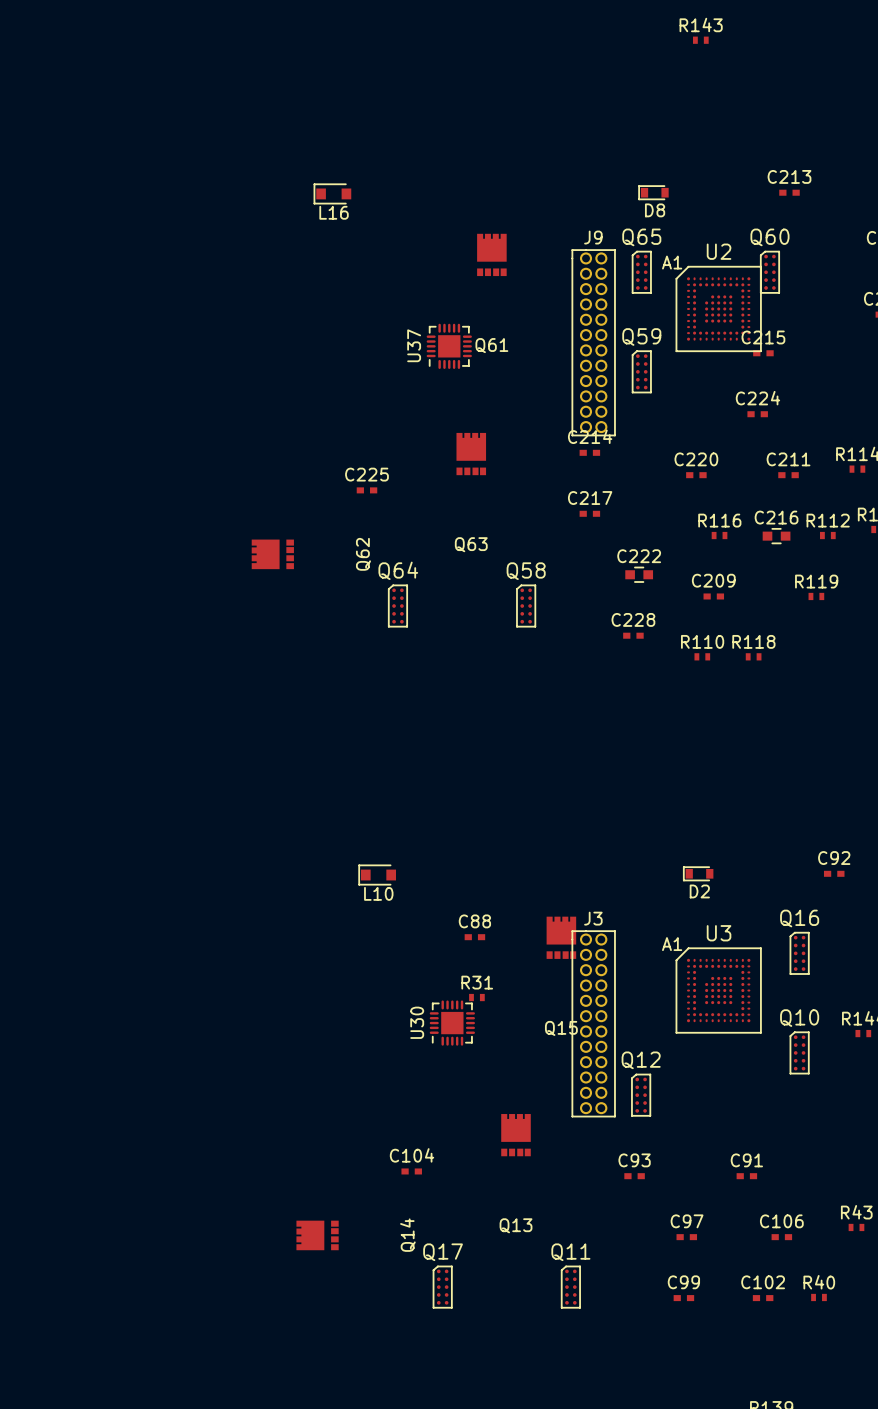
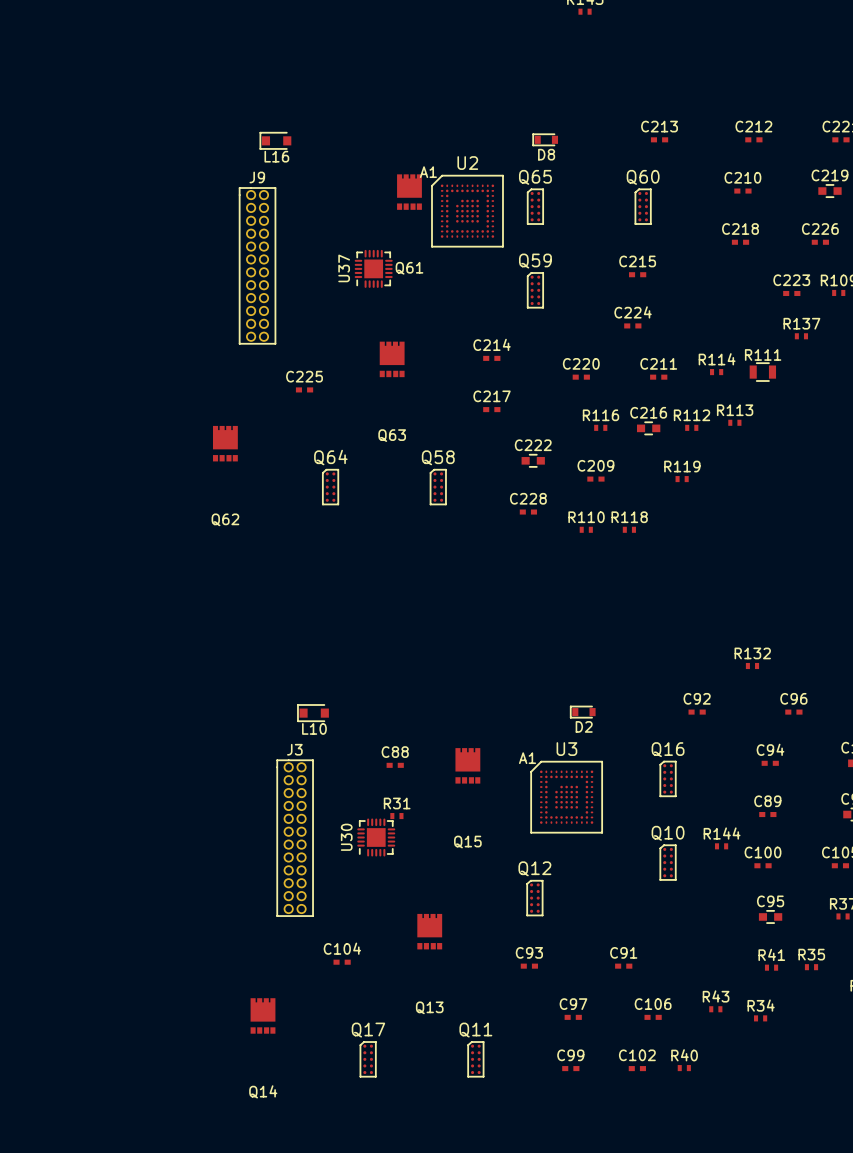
U2 position: (718, 308) -> (467, 211)
J9 position: (593, 342) -> (257, 265)
Q62 rotation: 0° (272, 554) -> 90° clockwise (225, 443)
U3 position: (718, 990) -> (566, 797)
J3 position: (593, 1023) -> (295, 838)
Q14 rotation: 0° (317, 1235) -> 90° clockwise (263, 1015)

